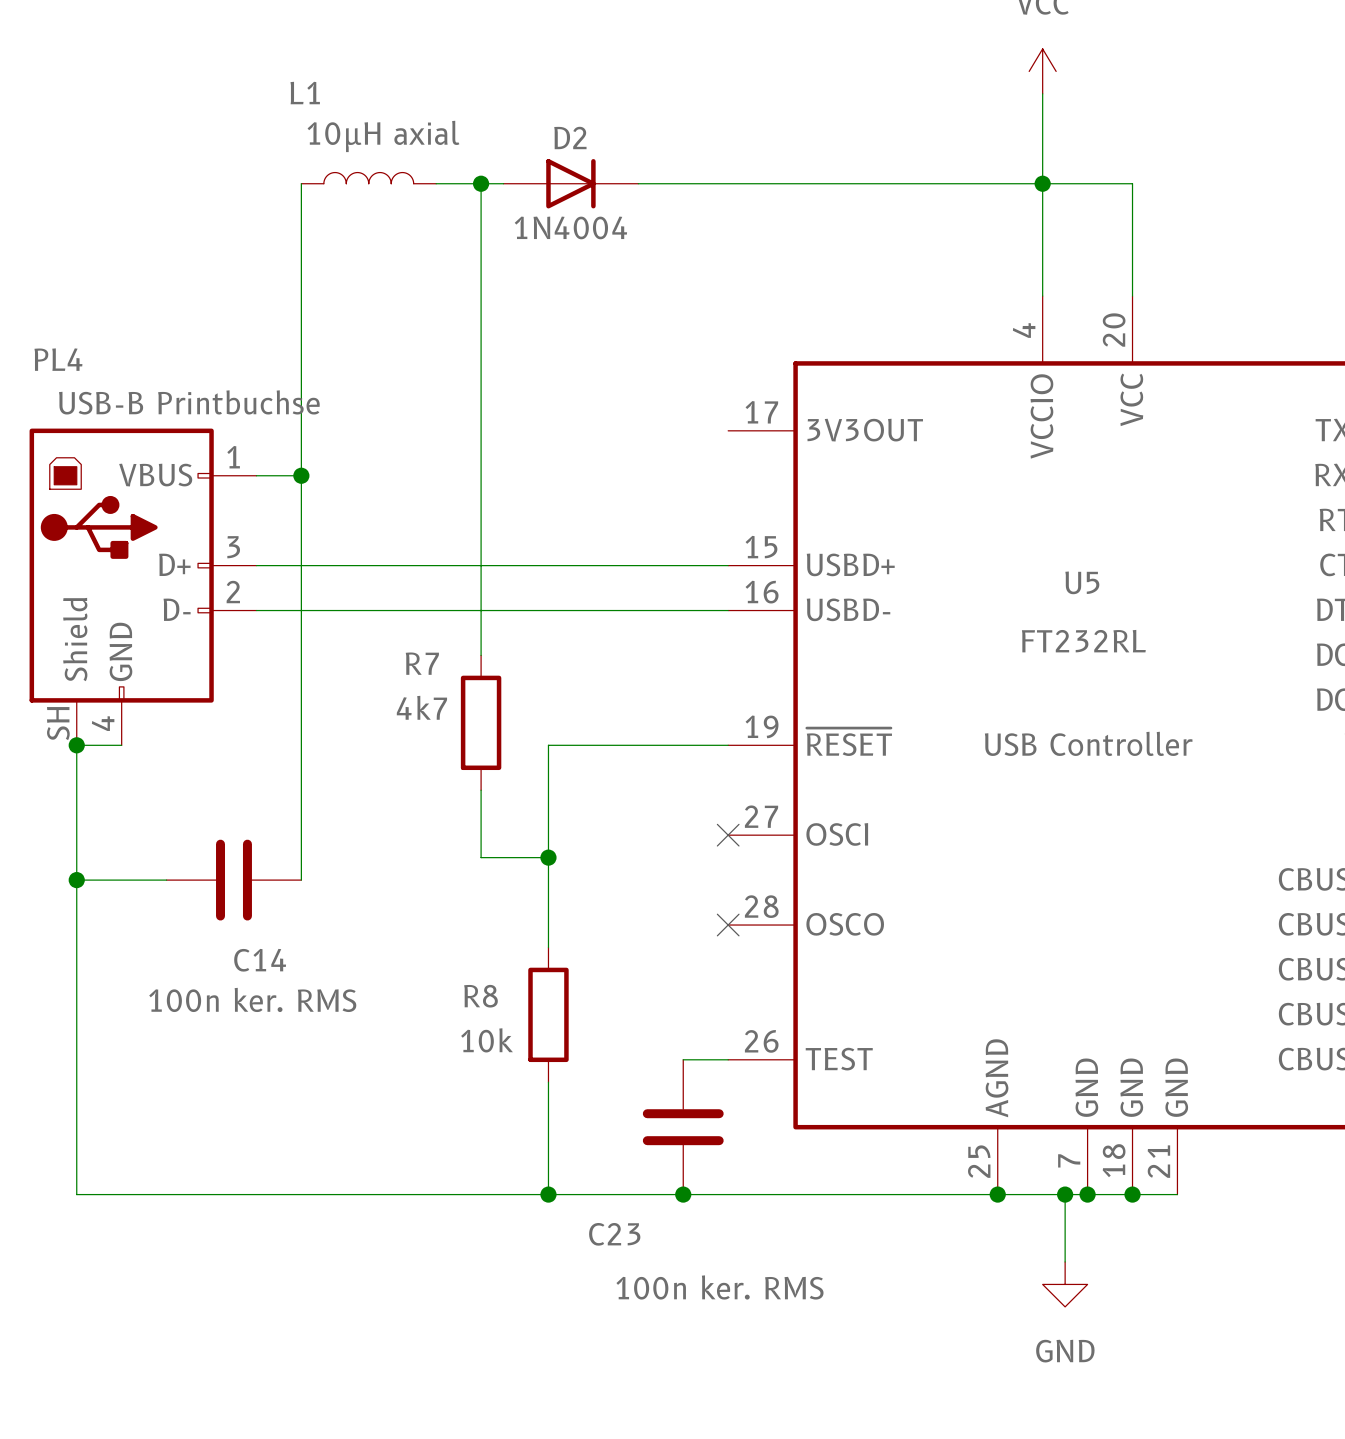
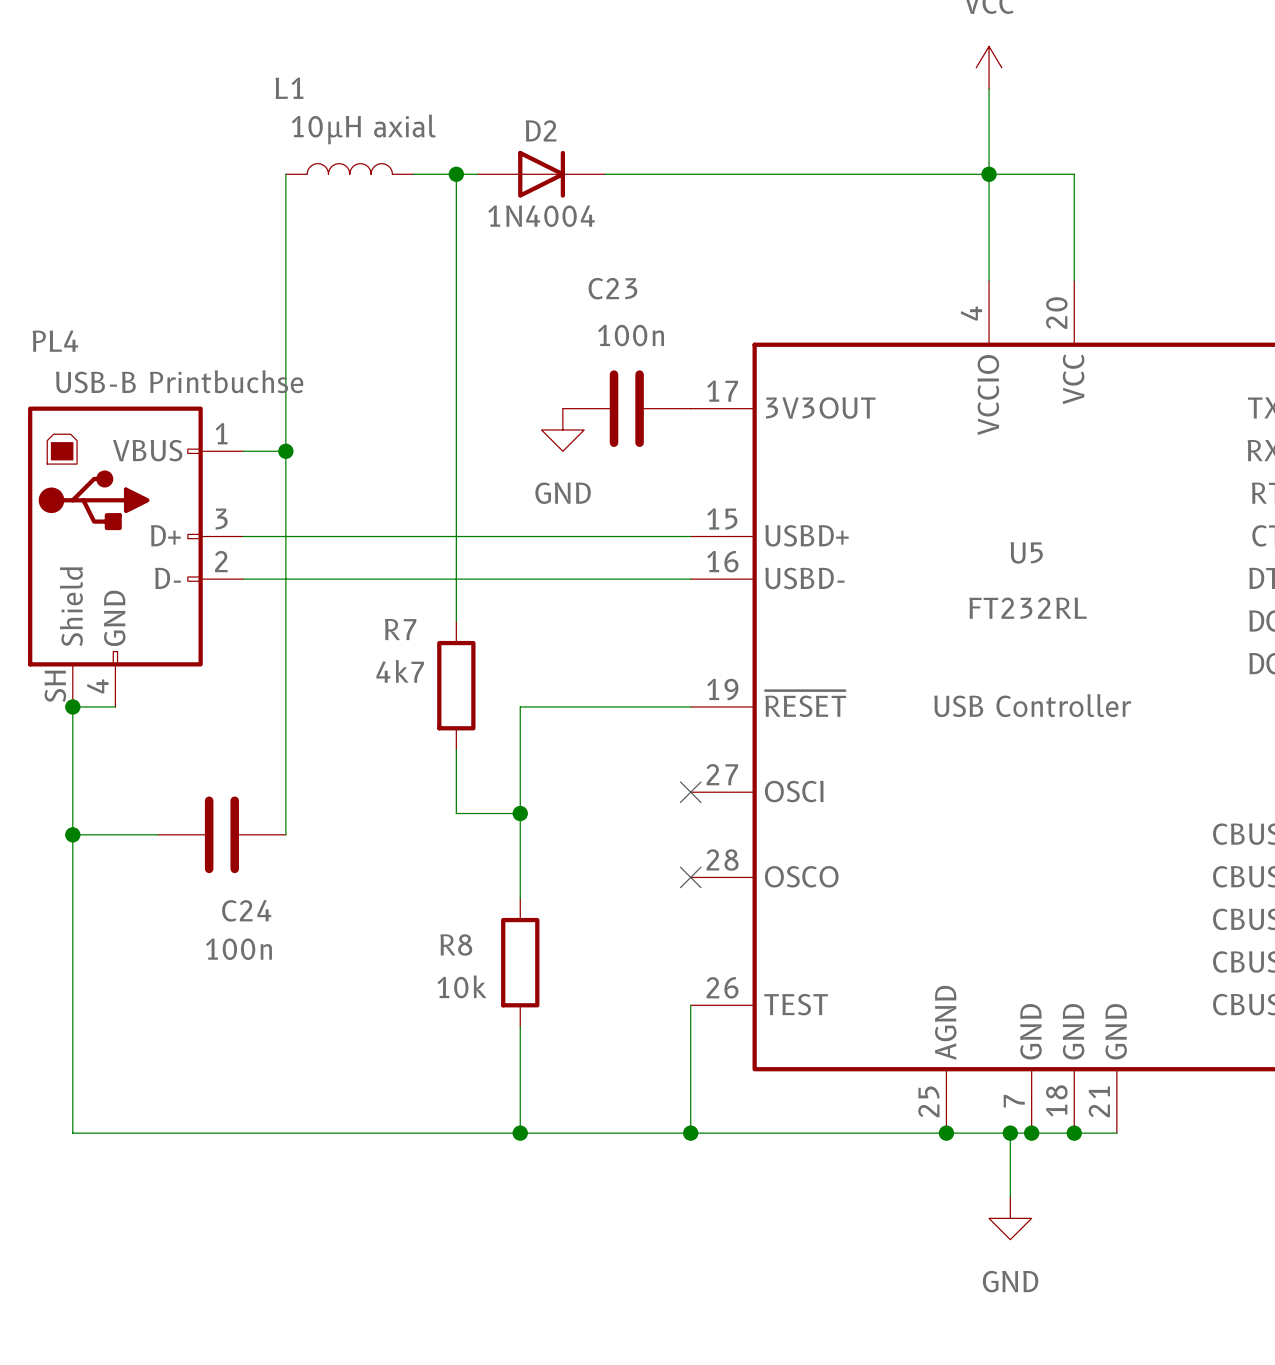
power symbol: none -> GND (562, 429)
C14 name: C14 (260, 960) -> C24 (246, 910)
C14 value: 100n ker. RMS (252, 999) -> 100n (238, 949)
wire: (683, 1059) (728, 1059) -> (690, 1133) (690, 1005)
C23 rotation: 0° (683, 1127) -> 90° clockwise (626, 408)
C23 position: (683, 1127) -> (626, 408)
junction position: (683, 1194) -> (690, 1133)
C23 name position: C23 (614, 1234) -> C23 (612, 288)
C23 value: 100n ker. RMS (719, 1287) -> 100n (631, 335)

